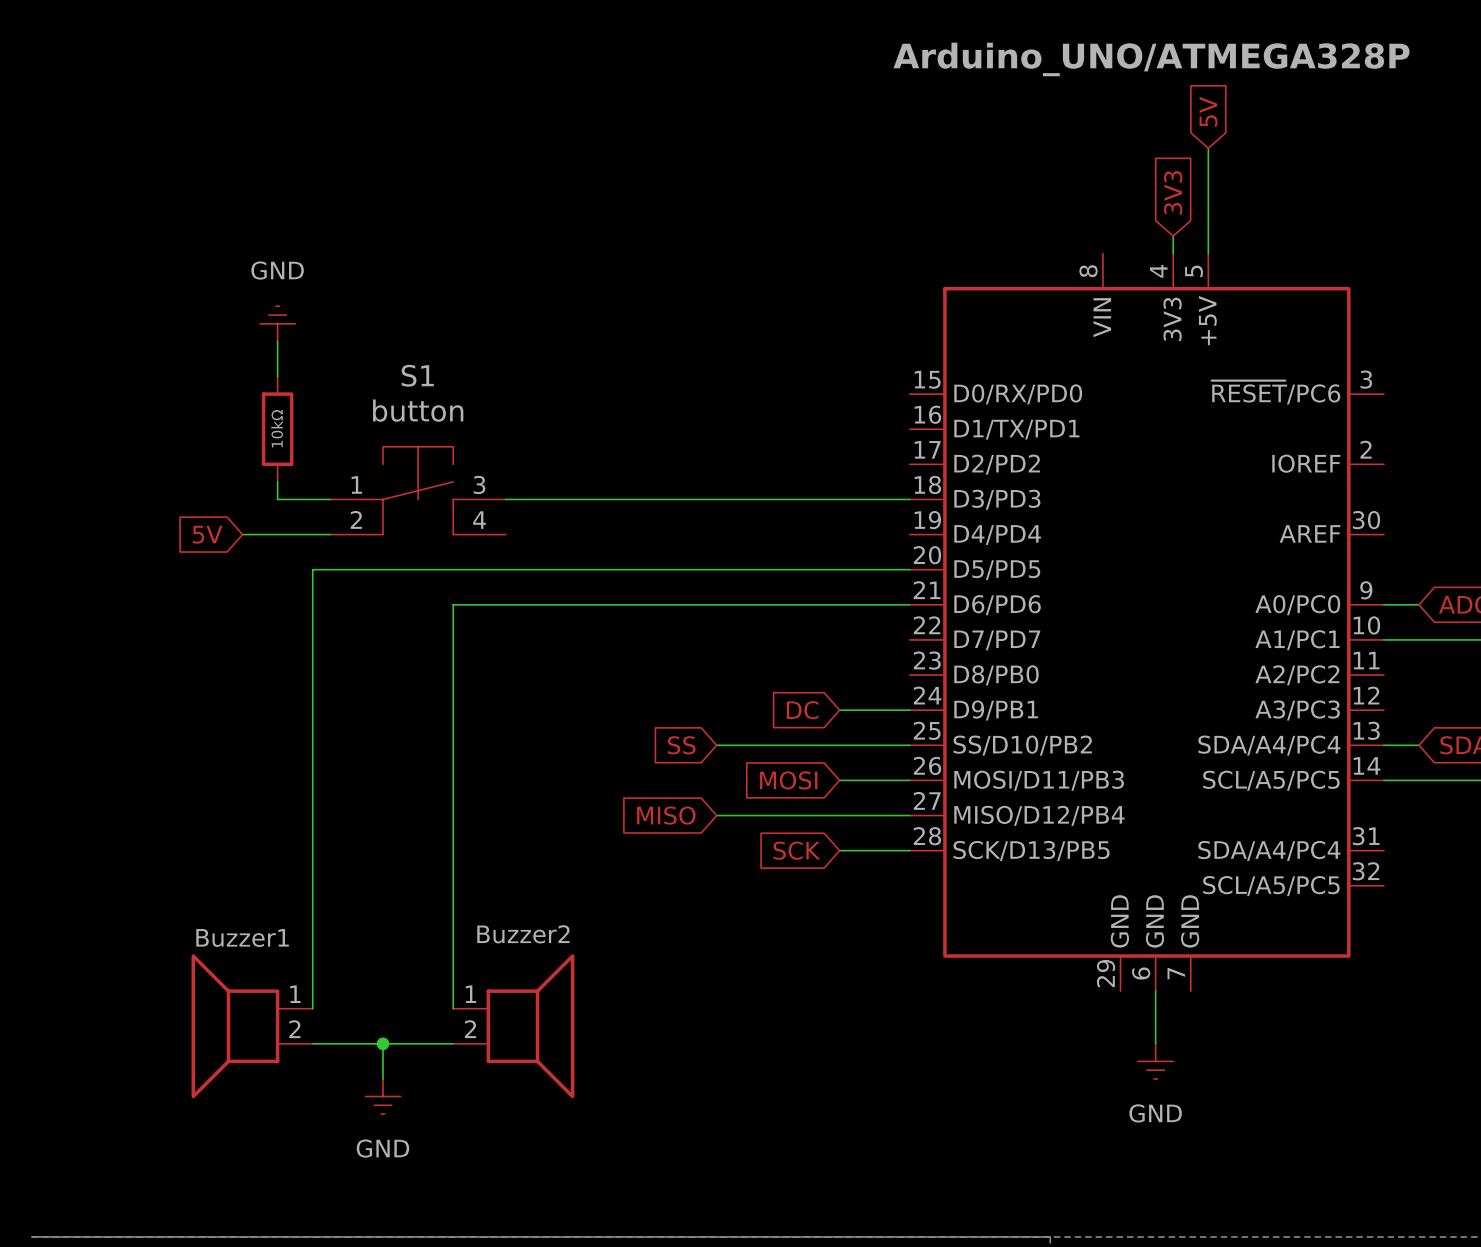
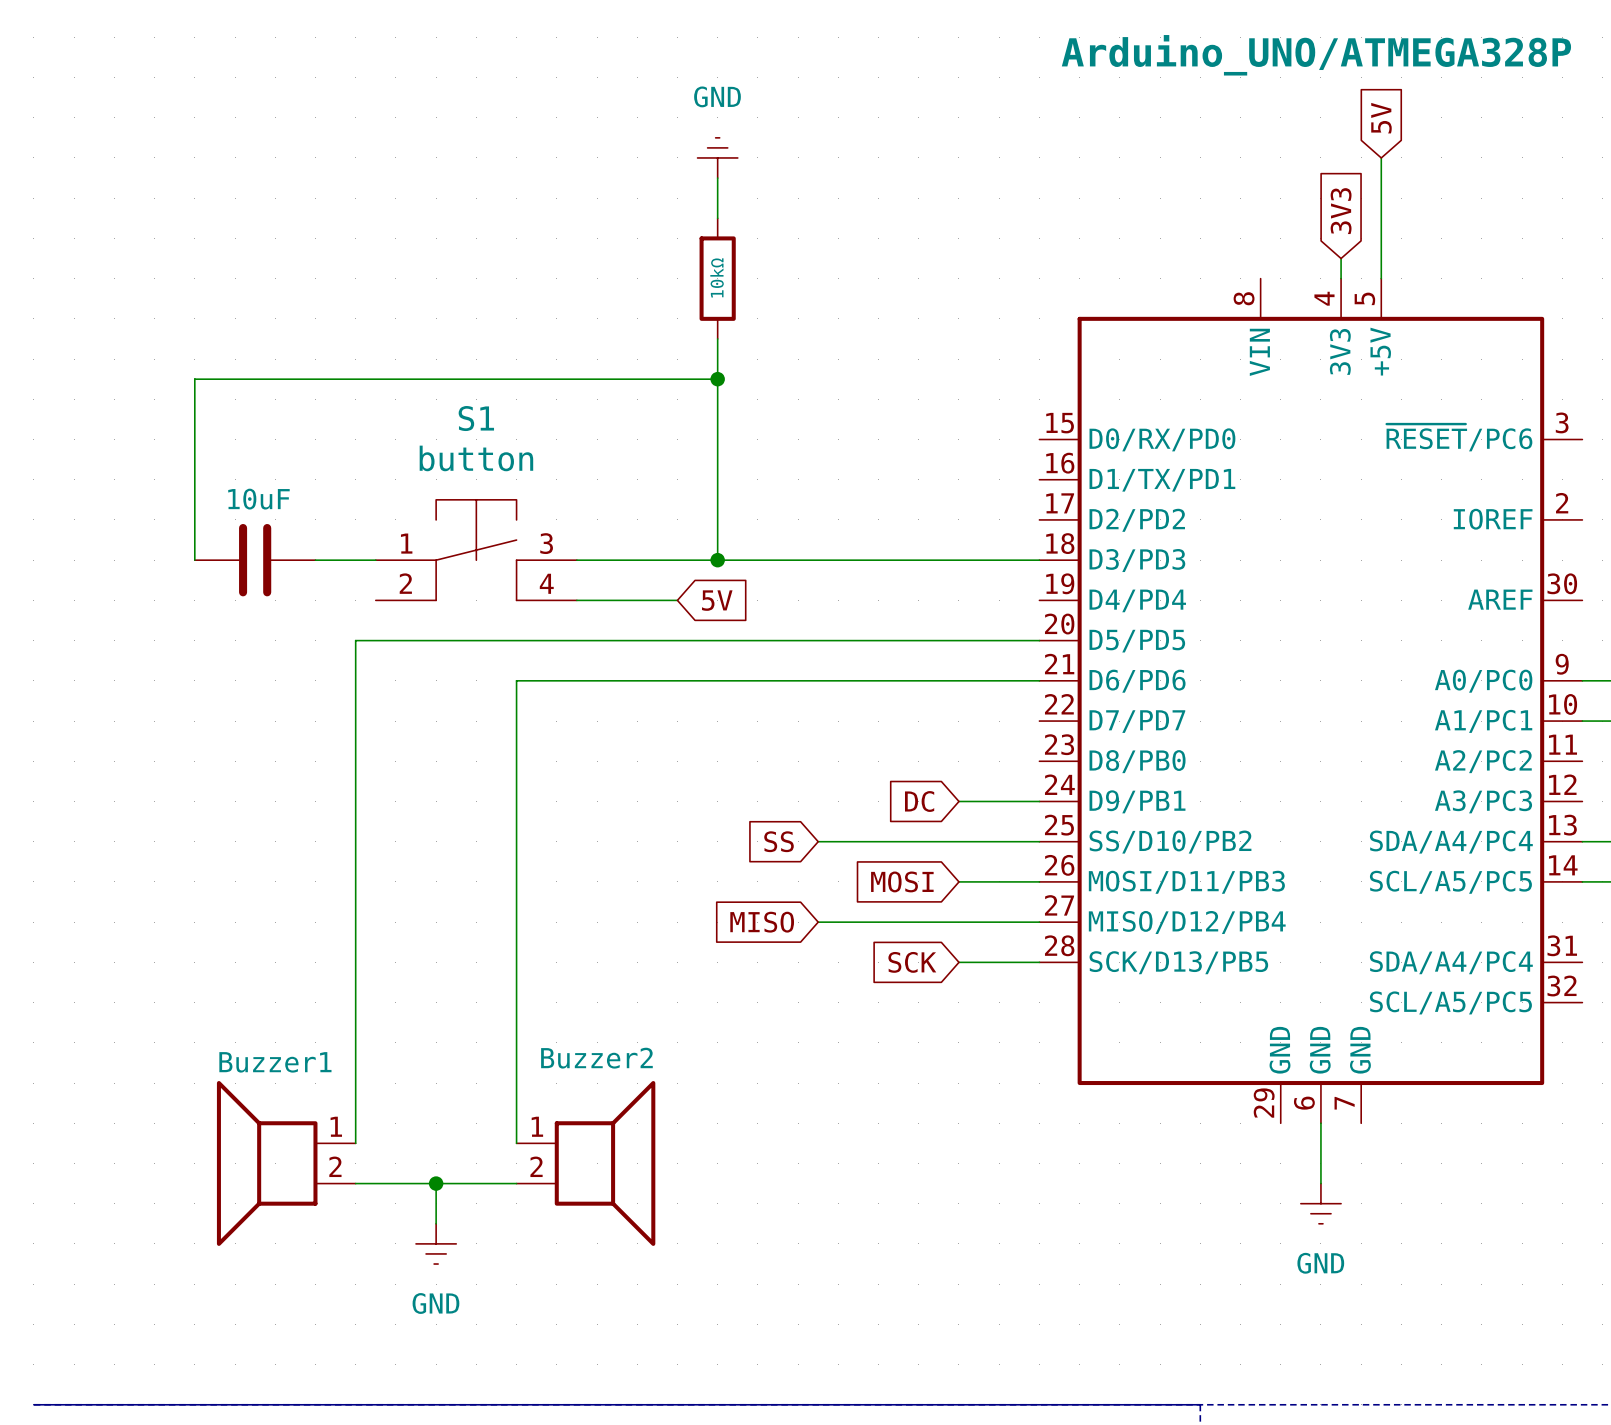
power symbol: none -> GND (717, 157)
wire: none -> (717, 178) (717, 218)
part: none -> 10kΩ (717, 278)
wire: none -> (717, 338) (717, 560)
power symbol: GND (277, 323) -> none
wire: (277, 341) (277, 376) -> none
wire: none -> (717, 379) (194, 379) (194, 560)
junction: none -> (717, 379)
part: 10kΩ (277, 429) -> none
wire: (277, 481) (277, 499) -> none
10uF: none -> (255, 560)
junction: none -> (717, 560)
global label: 5V (207, 534) -> none
wire: (242, 534) (330, 534) -> (576, 600) (677, 600)
global label: none -> 5V (717, 600)

